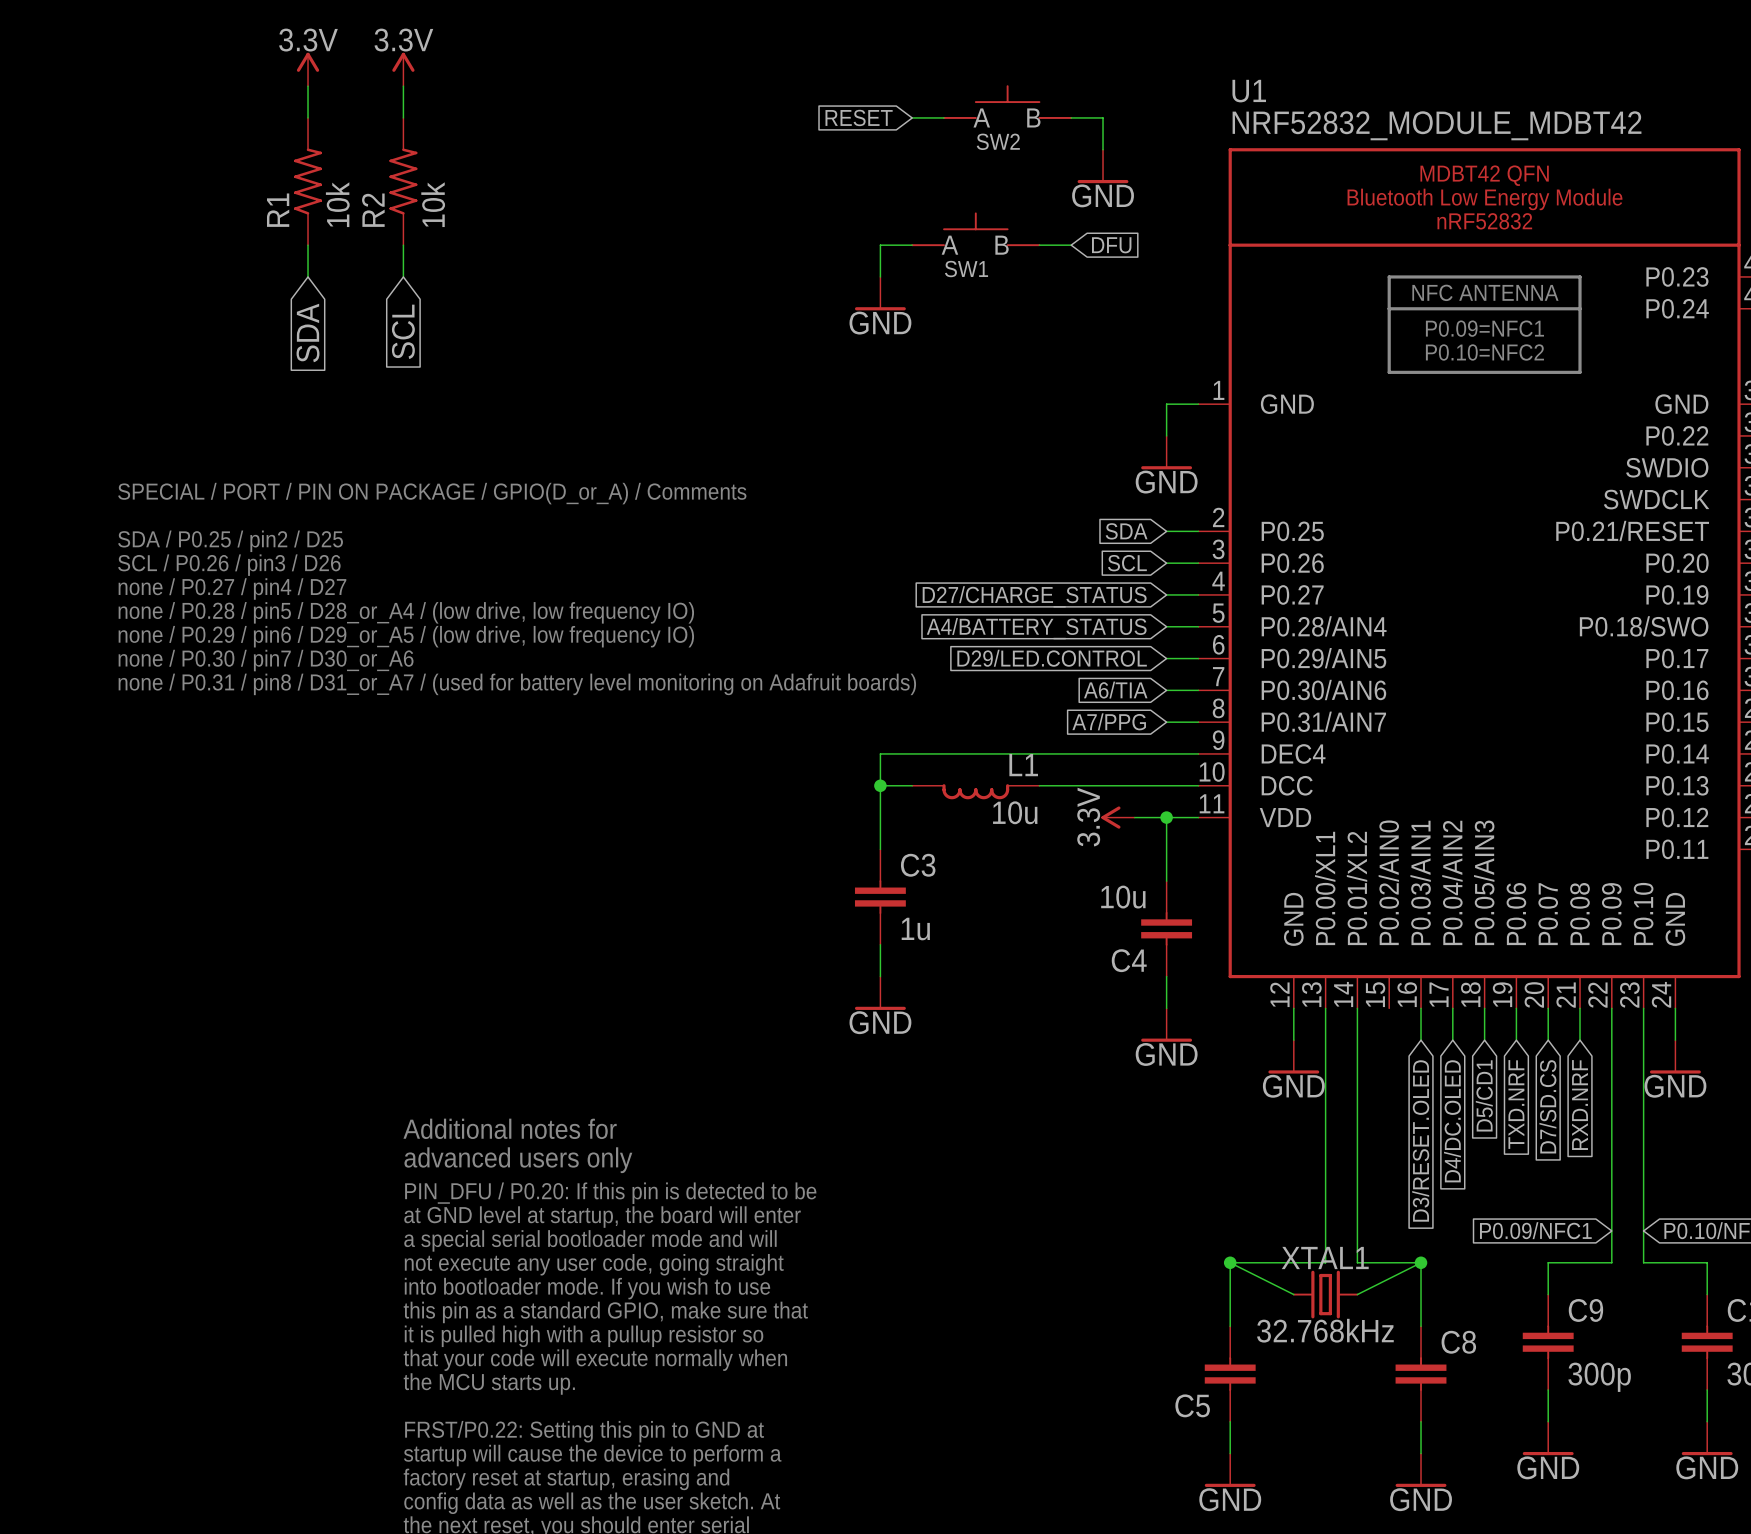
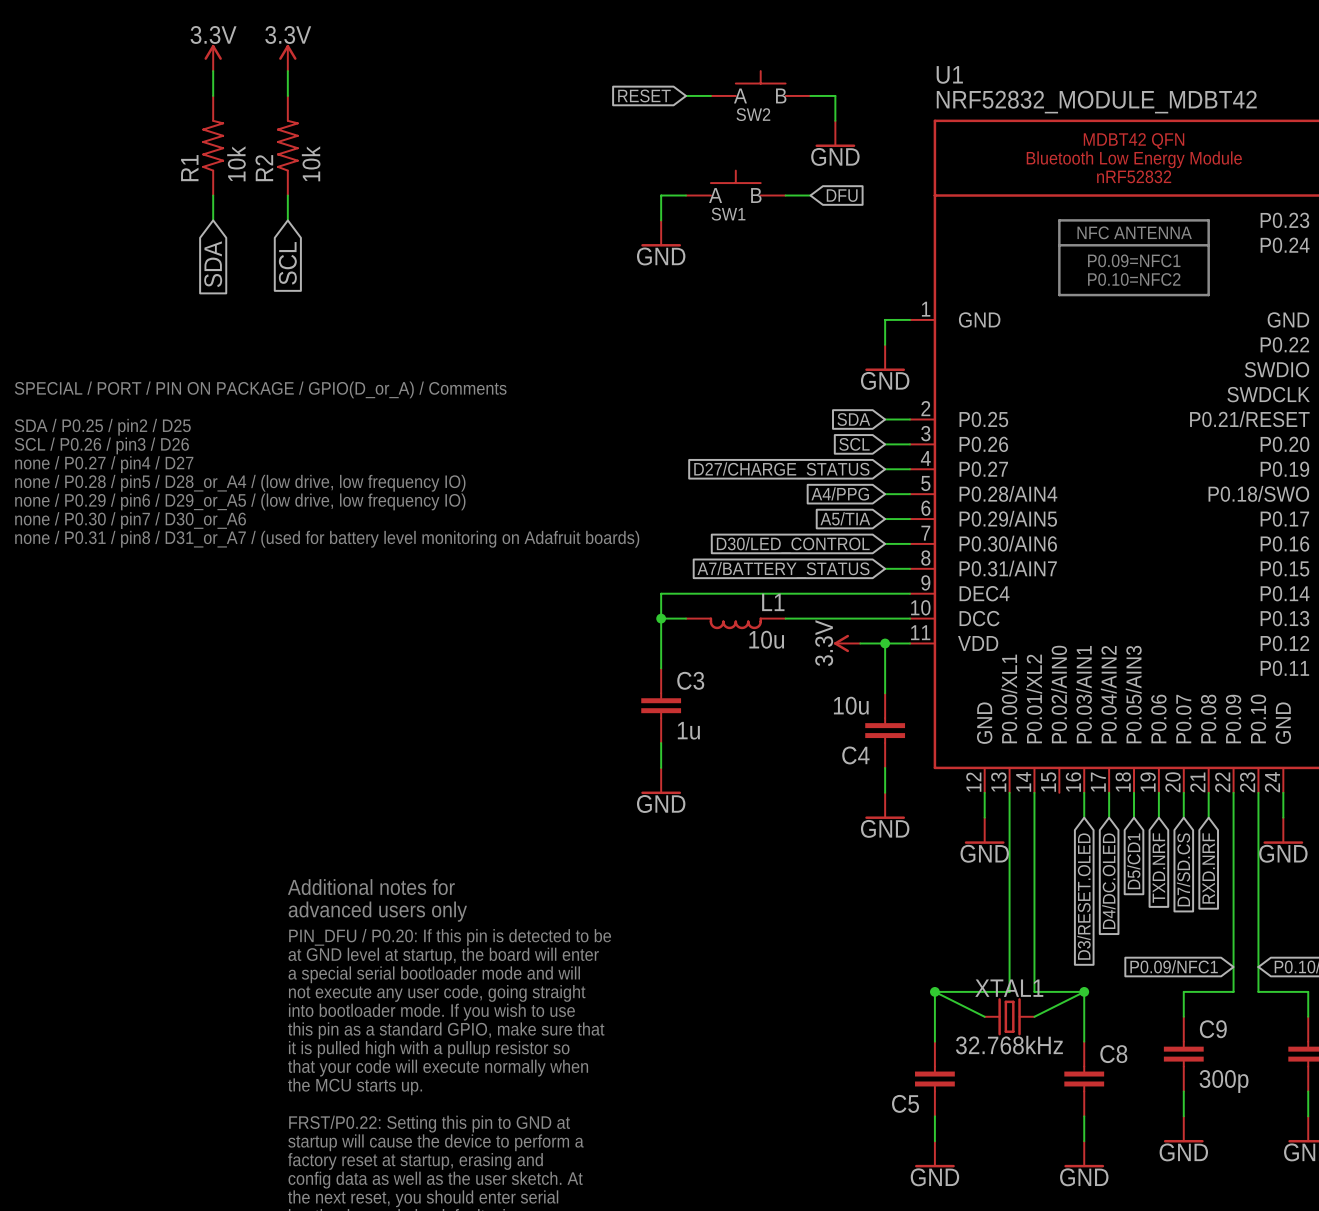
text position: SPECIAL / PORT / PIN ON PACKAGE / GPIO(D_or_A) / Comments (432, 493) -> SPECIAL / PORT / PIN ON PACKAGE / GPIO(D_or_A) / Comments (260, 389)
text position: SDA / P0.25 / pin2 / D25 (230, 541) -> SDA / P0.25 / pin2 / D25 (102, 427)
text position: SCL / P0.26 / pin3 / D26 (229, 565) -> SCL / P0.26 / pin3 / D26 (101, 445)
text position: none / P0.27 / pin4 / D27 (232, 588) -> none / P0.27 / pin4 / D27 (104, 464)
text position: none / P0.28 / pin5 / D28_or_A4 / (low drive, low frequency IO) (406, 612) -> none / P0.28 / pin5 / D28_or_A4 / (low drive, low frequency IO) (240, 483)
global label: A4/BATTERY_STATUS (1036, 628) -> A4/PPG (840, 493)
text position: none / P0.29 / pin6 / D29_or_A5 / (low drive, low frequency IO) (406, 636) -> none / P0.29 / pin6 / D29_or_A5 / (low drive, low frequency IO) (240, 501)
global label: D29/LED.CONTROL (1052, 658) -> A5/TIA (845, 518)
text position: none / P0.30 / pin7 / D30_or_A6 (266, 660) -> none / P0.30 / pin7 / D30_or_A6 (130, 520)
text position: none / P0.31 / pin8 / D31_or_A7 / (used for battery level monitoring on Adafruit boards) (517, 684) -> none / P0.31 / pin8 / D31_or_A7 / (used for battery level monitoring on Adafruit boards) (327, 539)
global label: A6/TIA (1115, 690) -> D30/LED_CONTROL (793, 545)
global label: A7/PPG (1109, 721) -> A7/BATTERY_STATUS (783, 570)

